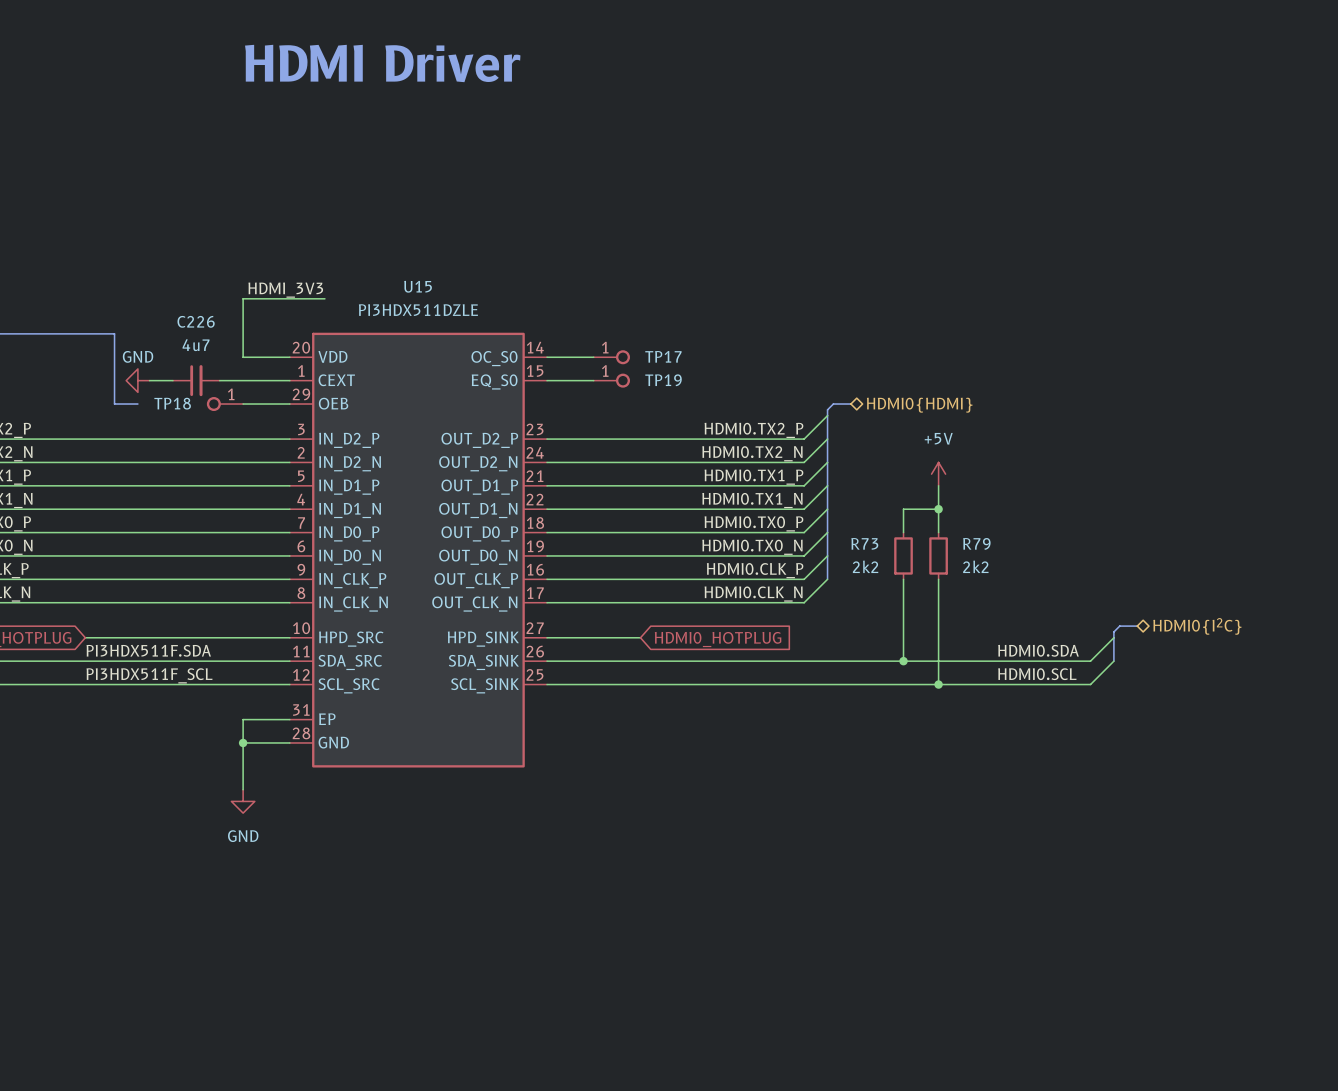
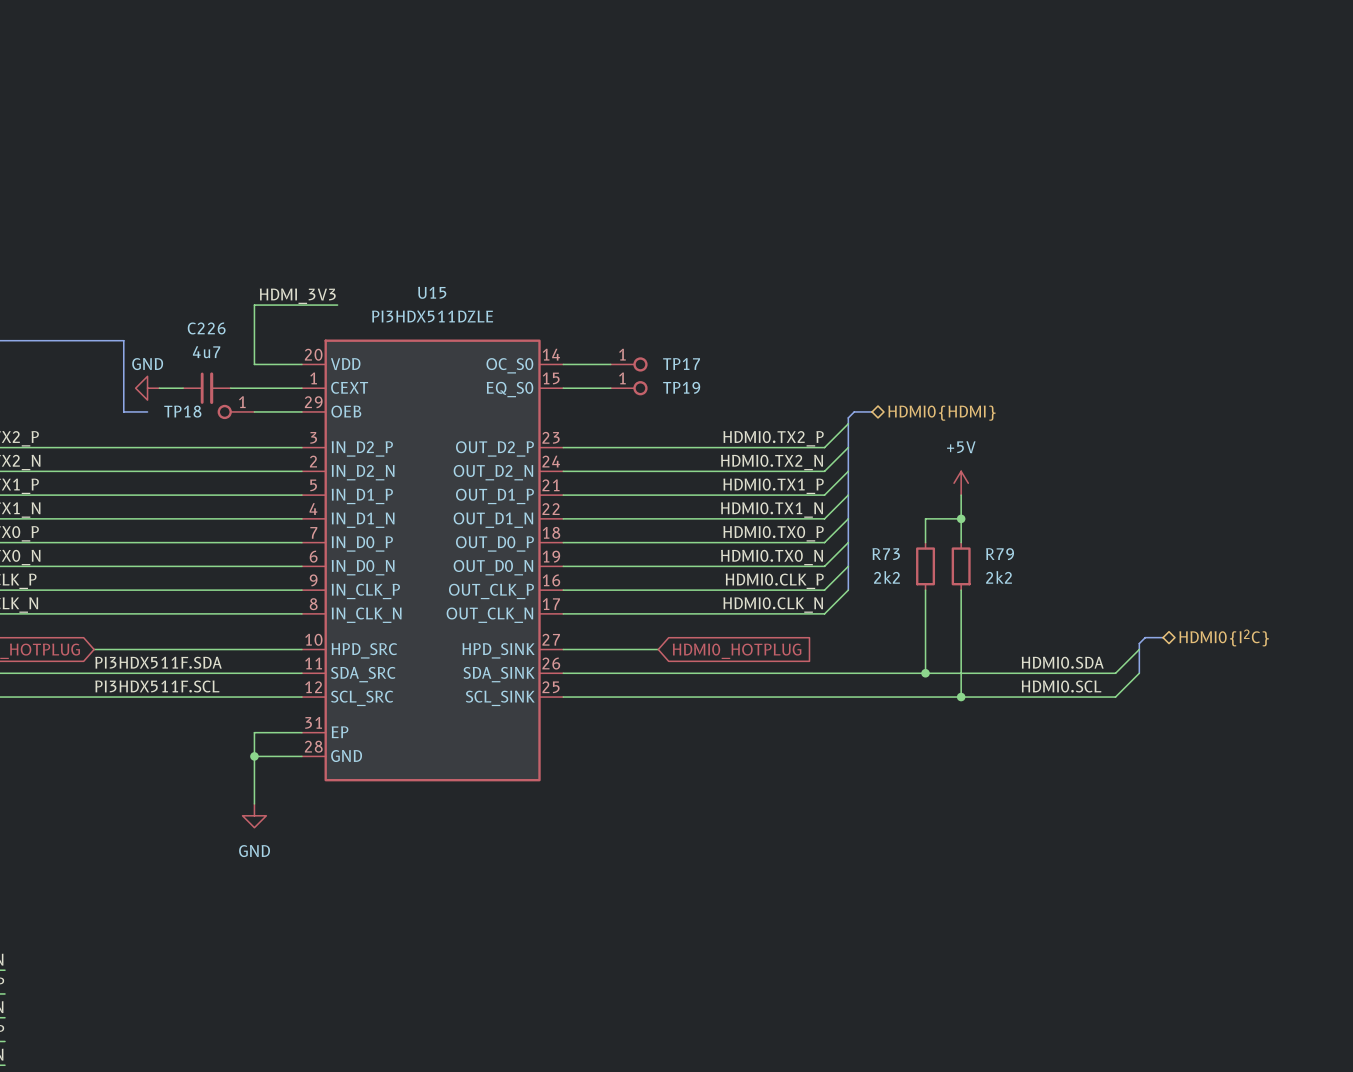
text: HDMI Driver (382, 63) -> none
label: PI3HDX511F_SCL (149, 675) -> PI3HDX511F.SCL (157, 686)

